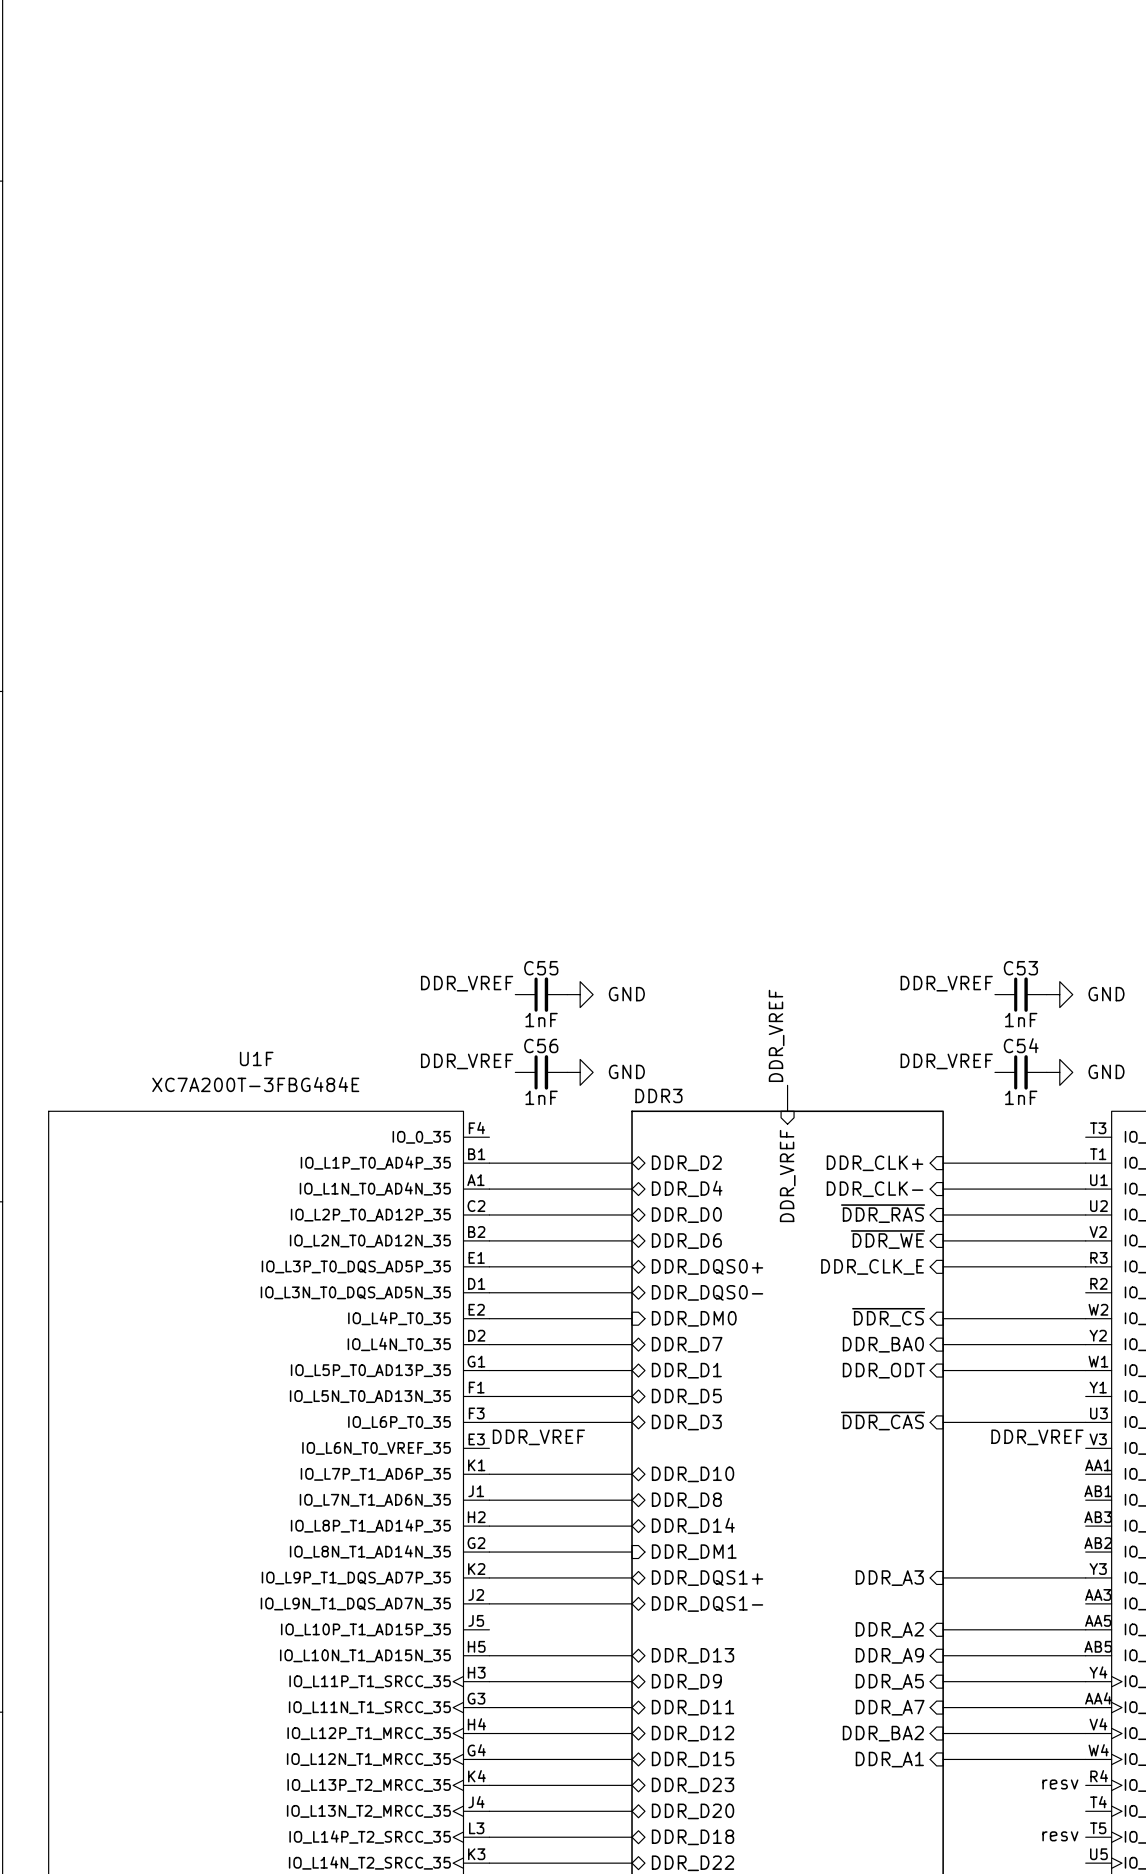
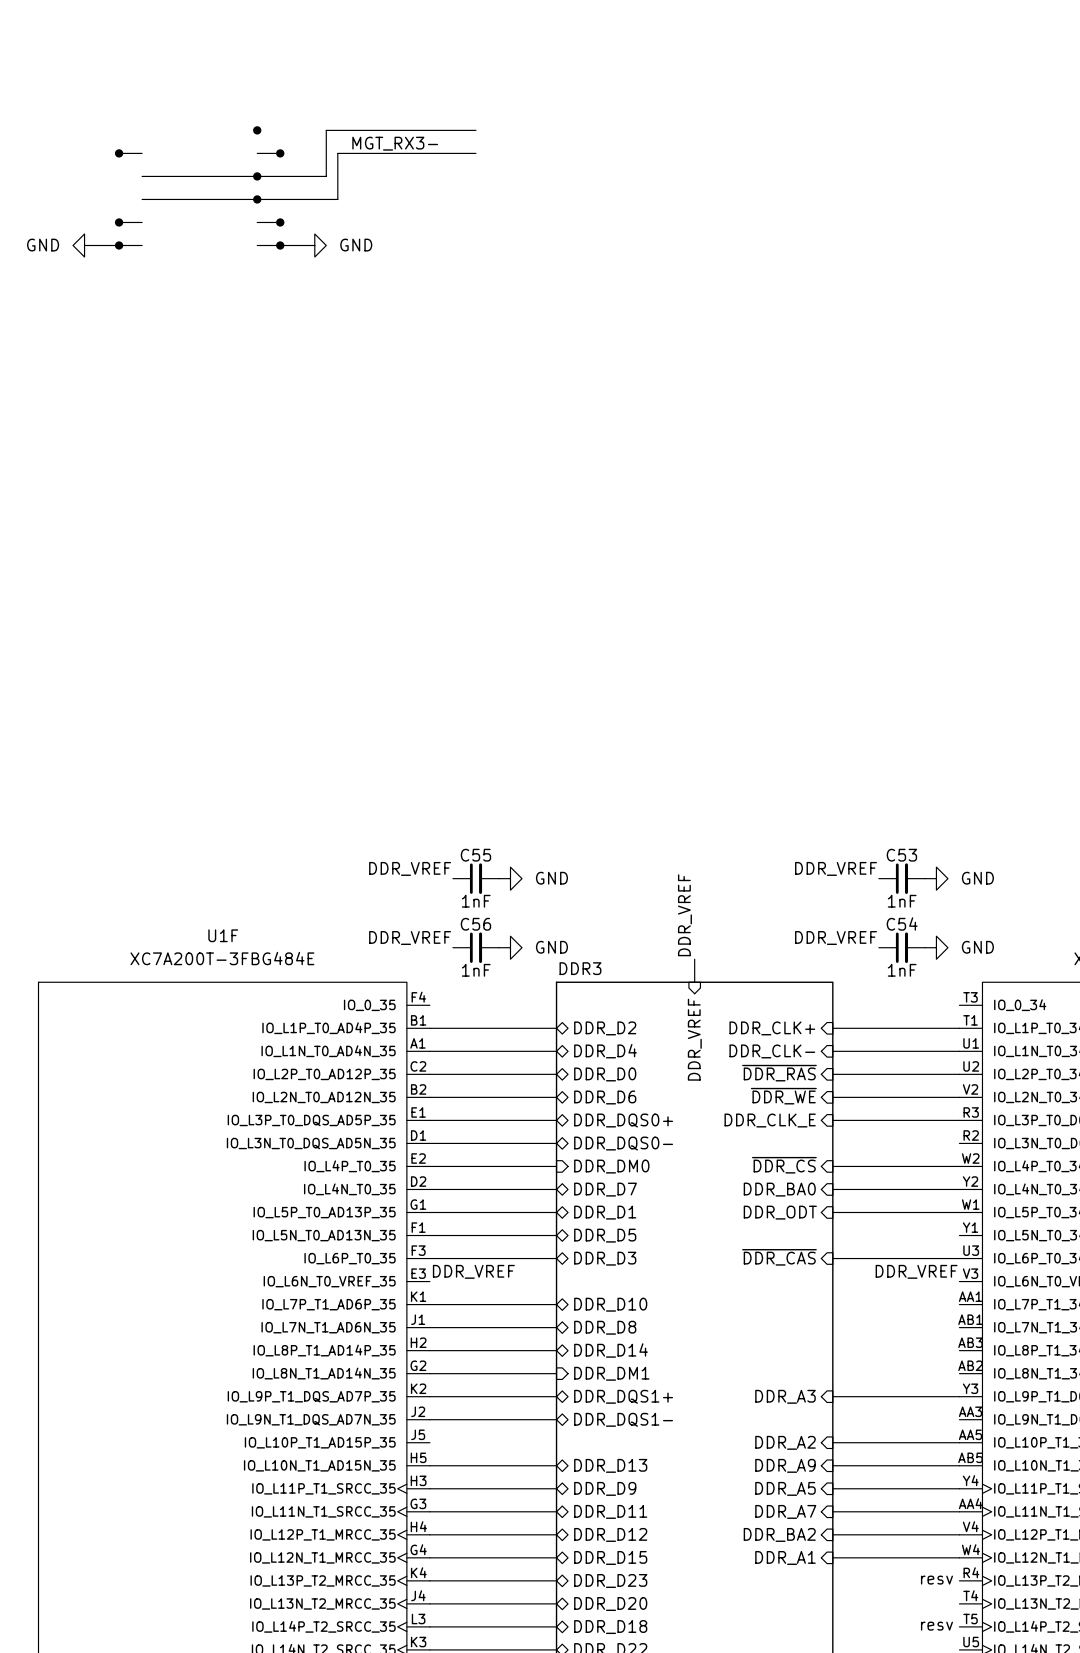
junction: none -> (257, 130)
wire: none -> (475, 130) (326, 130) (326, 176) (142, 176)
label: none -> MGT_RX3- (395, 143)
wire: none -> (119, 153) (142, 153)
junction: none -> (119, 153)
wire: none -> (257, 153) (280, 153)
junction: none -> (280, 153)
wire: none -> (475, 153) (337, 153) (337, 199) (142, 199)
junction: none -> (257, 176)
junction: none -> (257, 199)
wire: none -> (119, 222) (142, 222)
junction: none -> (119, 222)
wire: none -> (257, 222) (280, 222)
junction: none -> (280, 222)
power symbol: none -> GND (84, 245)
wire: none -> (96, 245) (142, 245)
junction: none -> (119, 245)
wire: none -> (257, 245) (303, 245)
junction: none -> (280, 245)
power symbol: none -> GND (314, 245)

